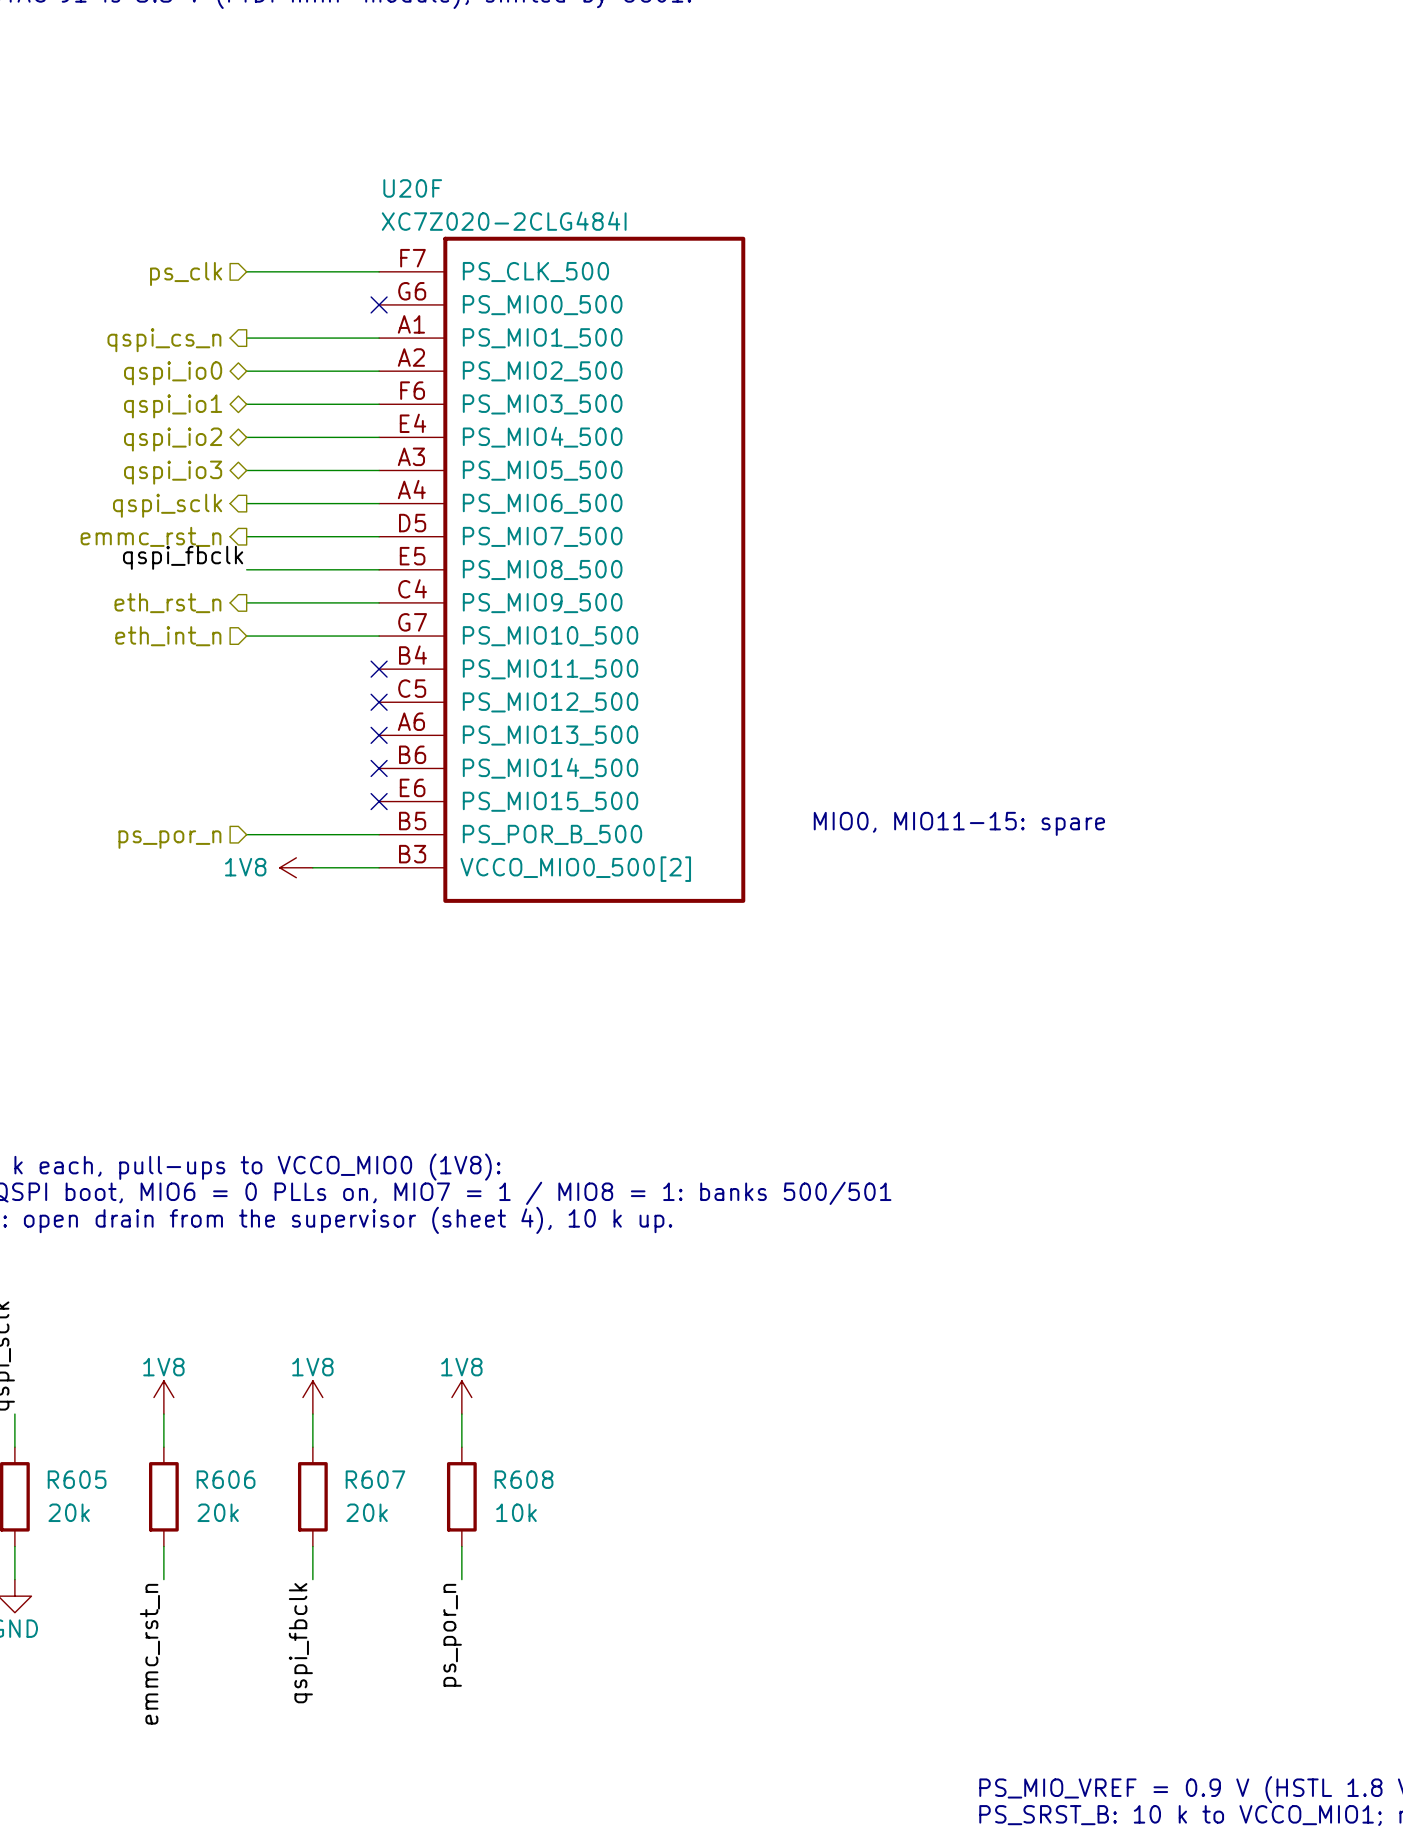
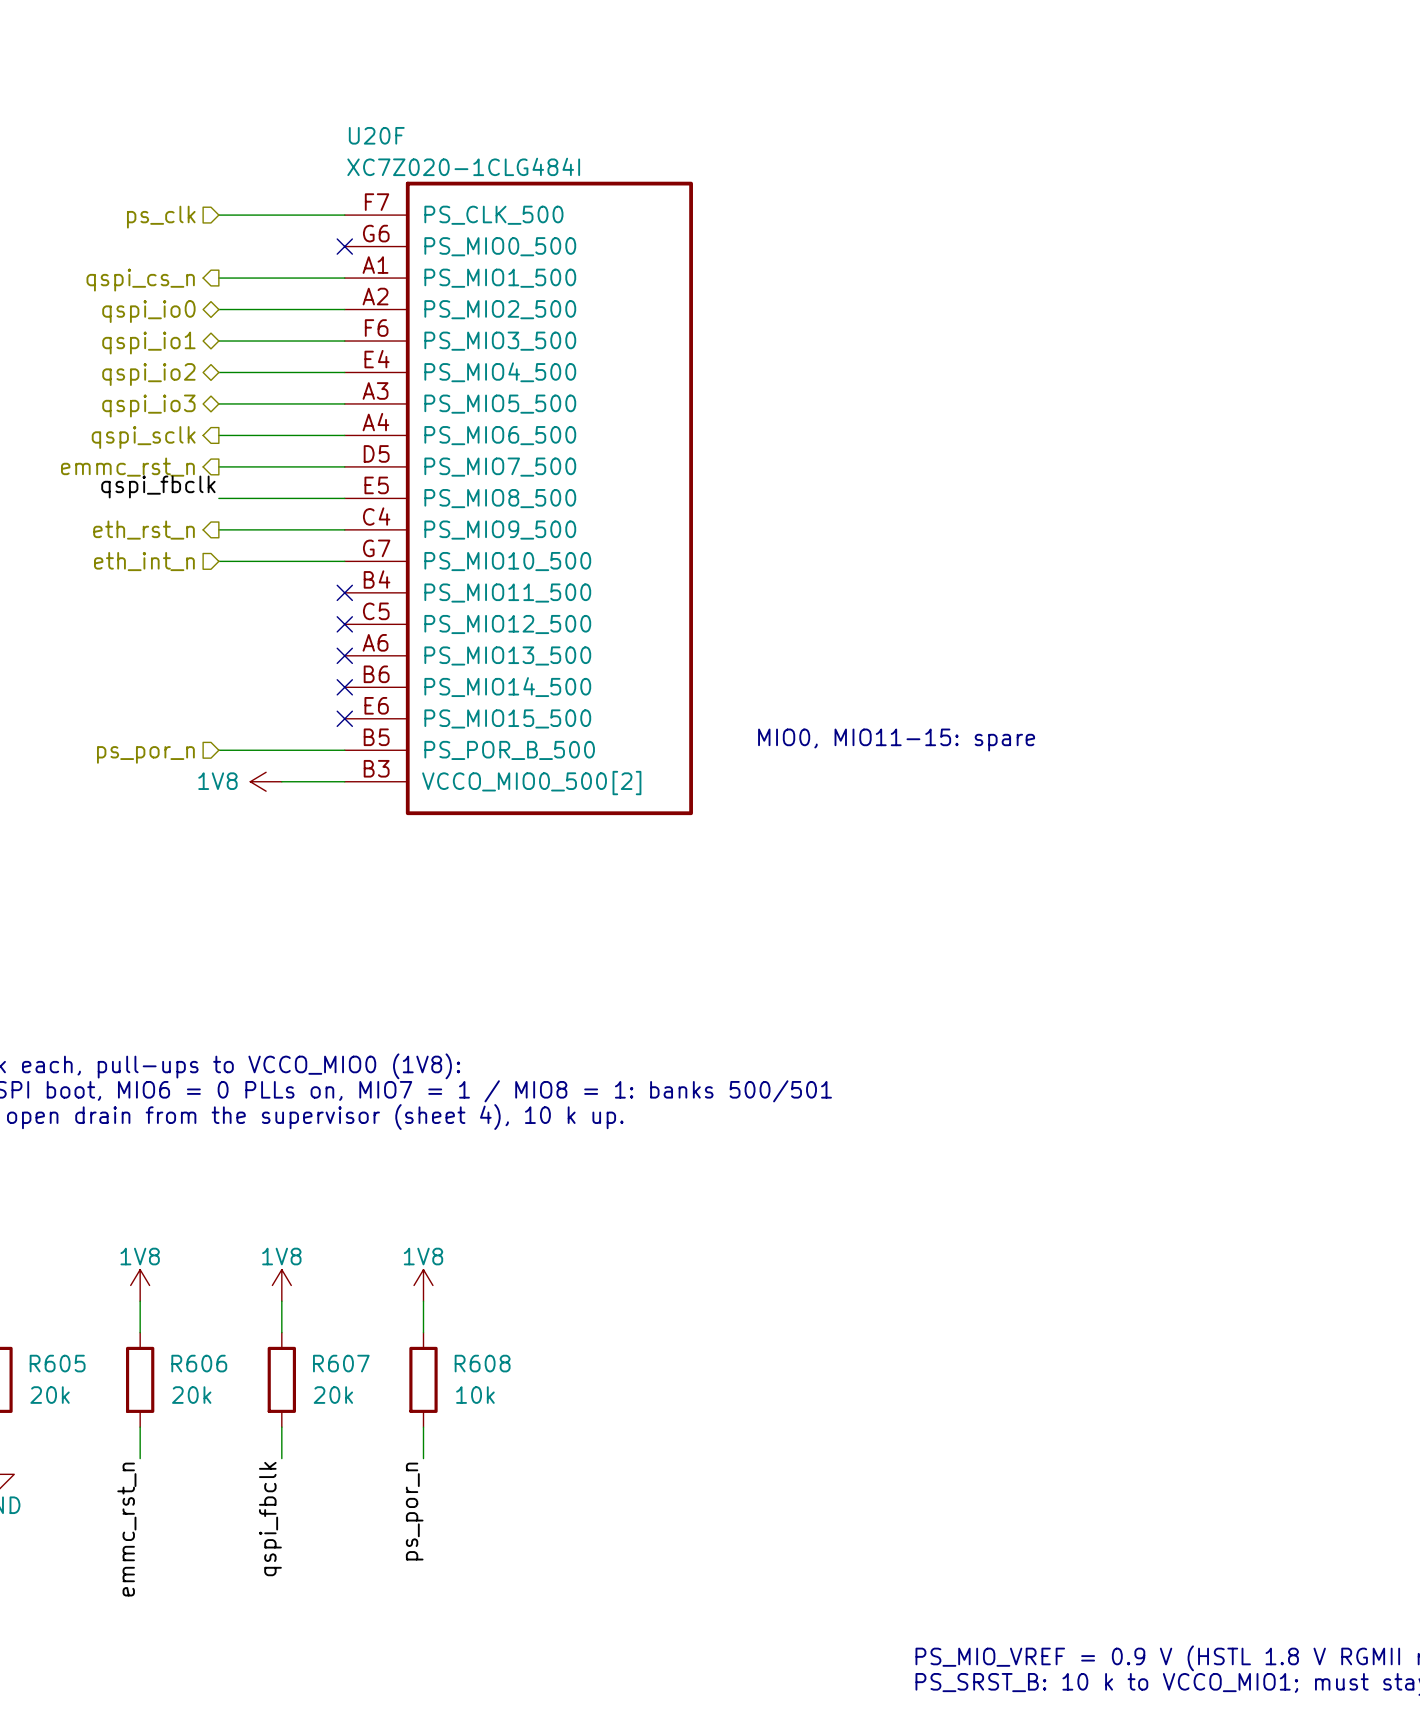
U20F value: XC7Z020-2CLG484I (504, 221) -> XC7Z020-1CLG484I (463, 166)

